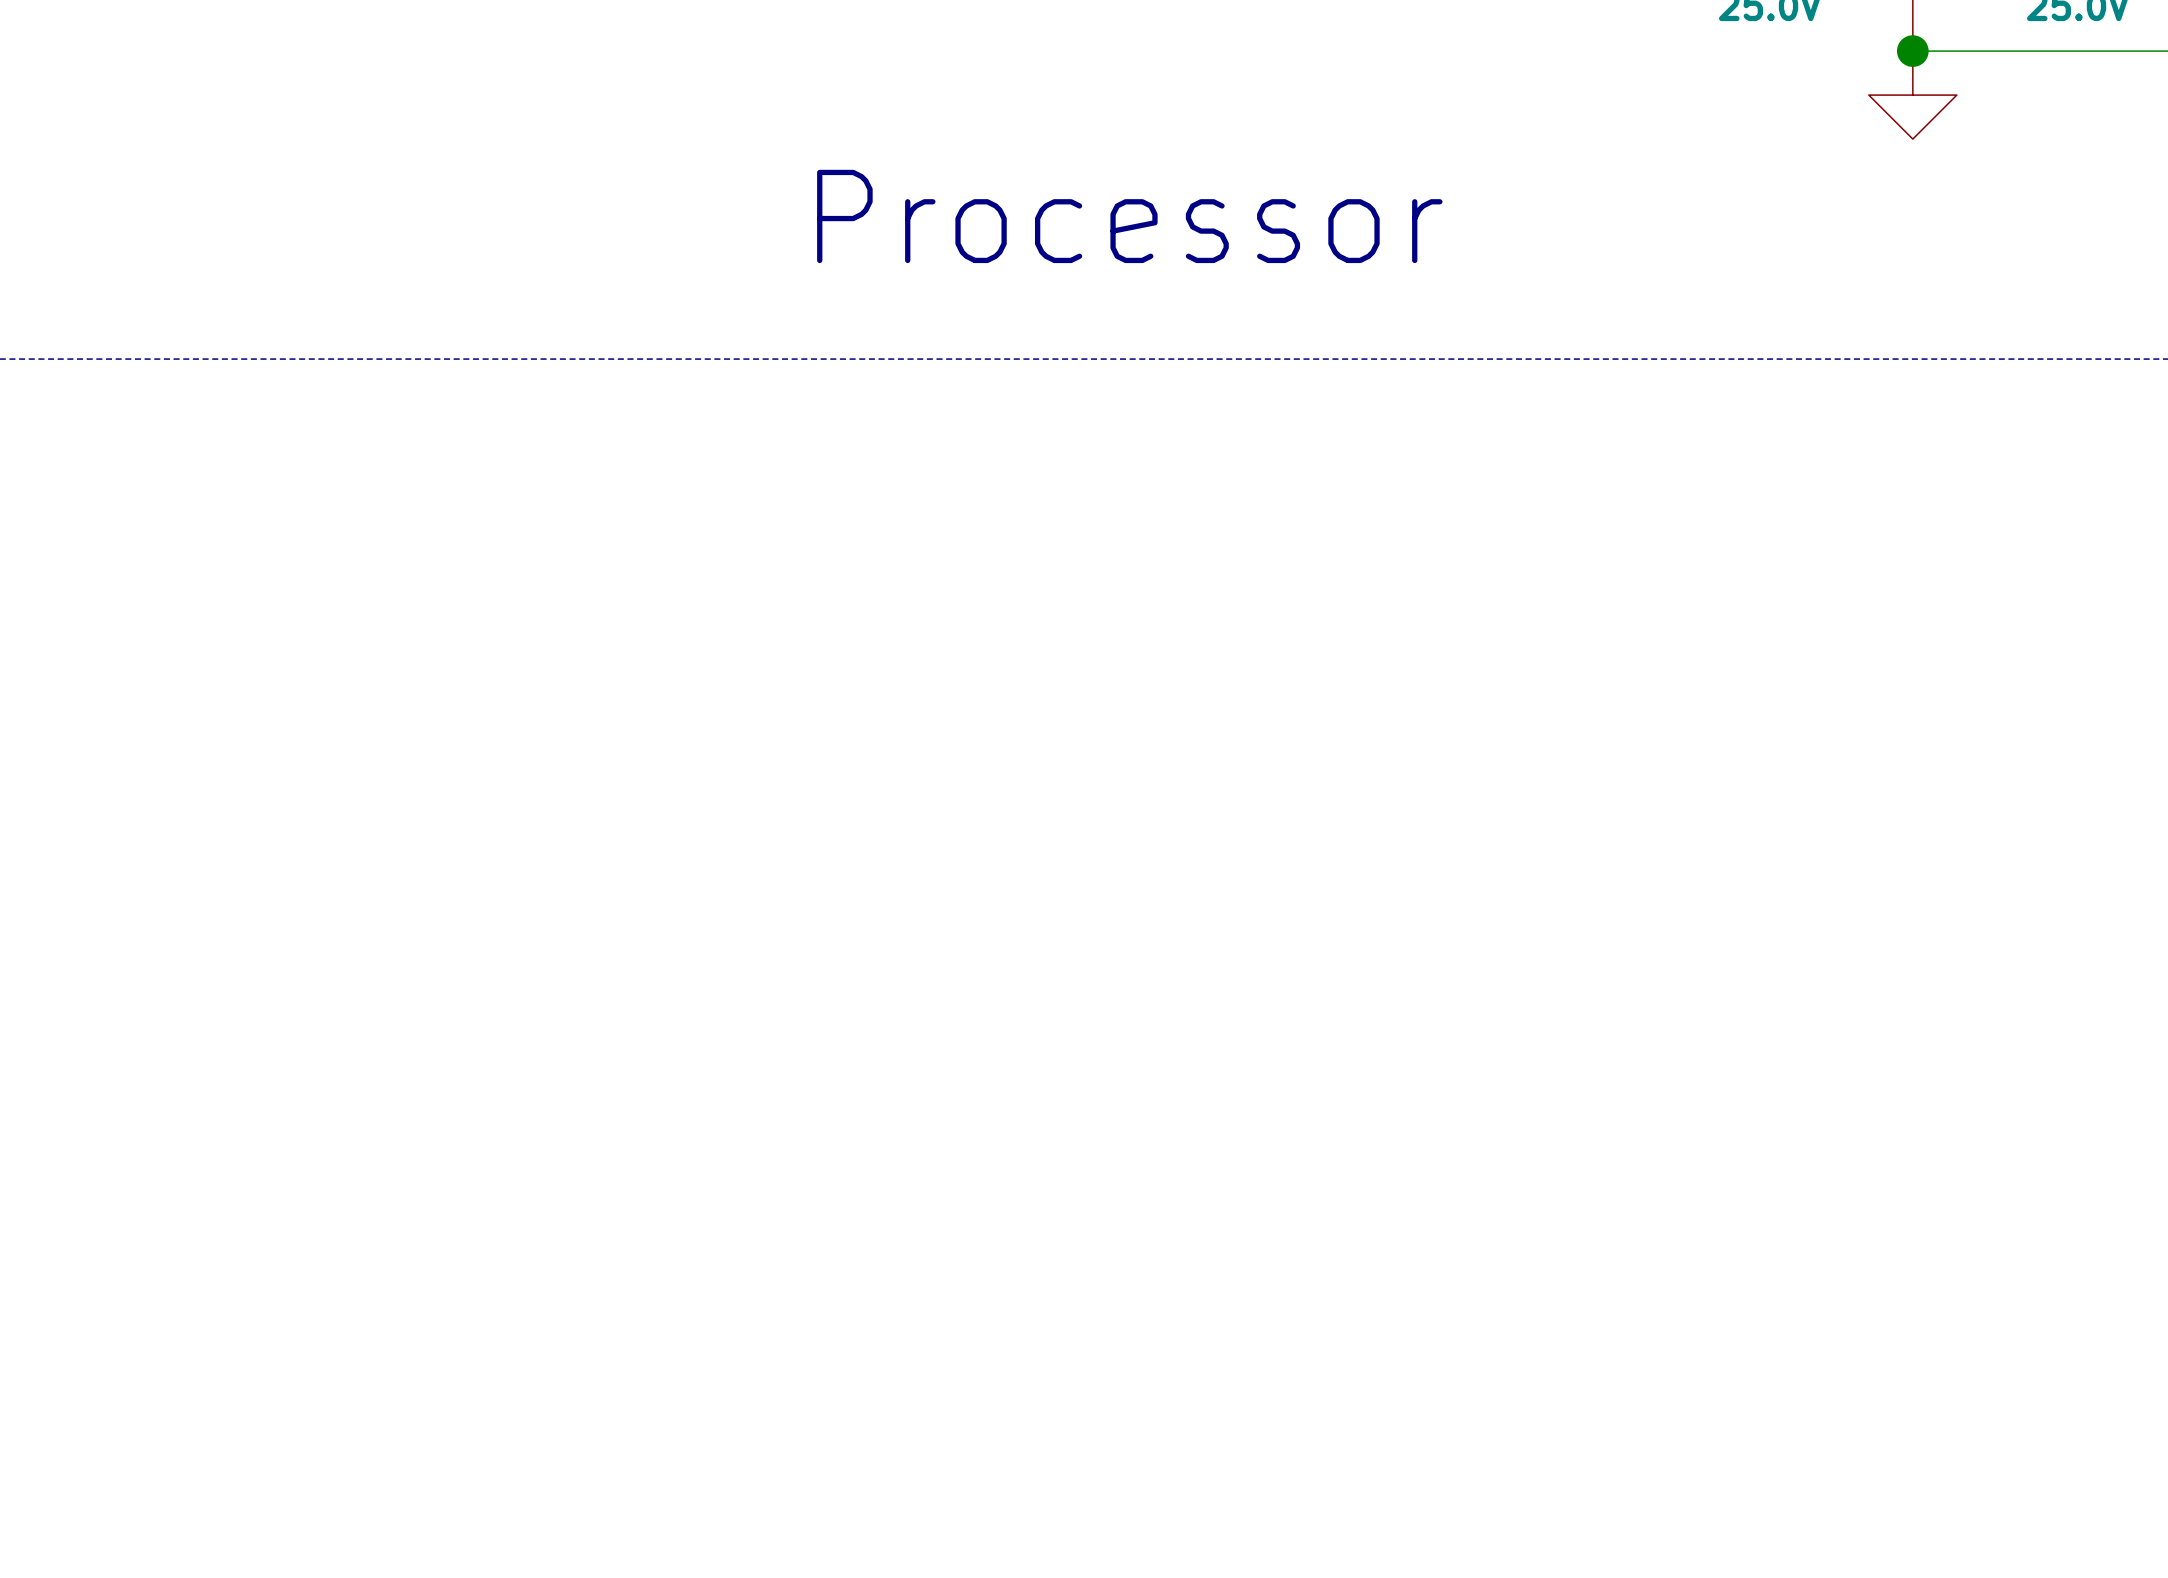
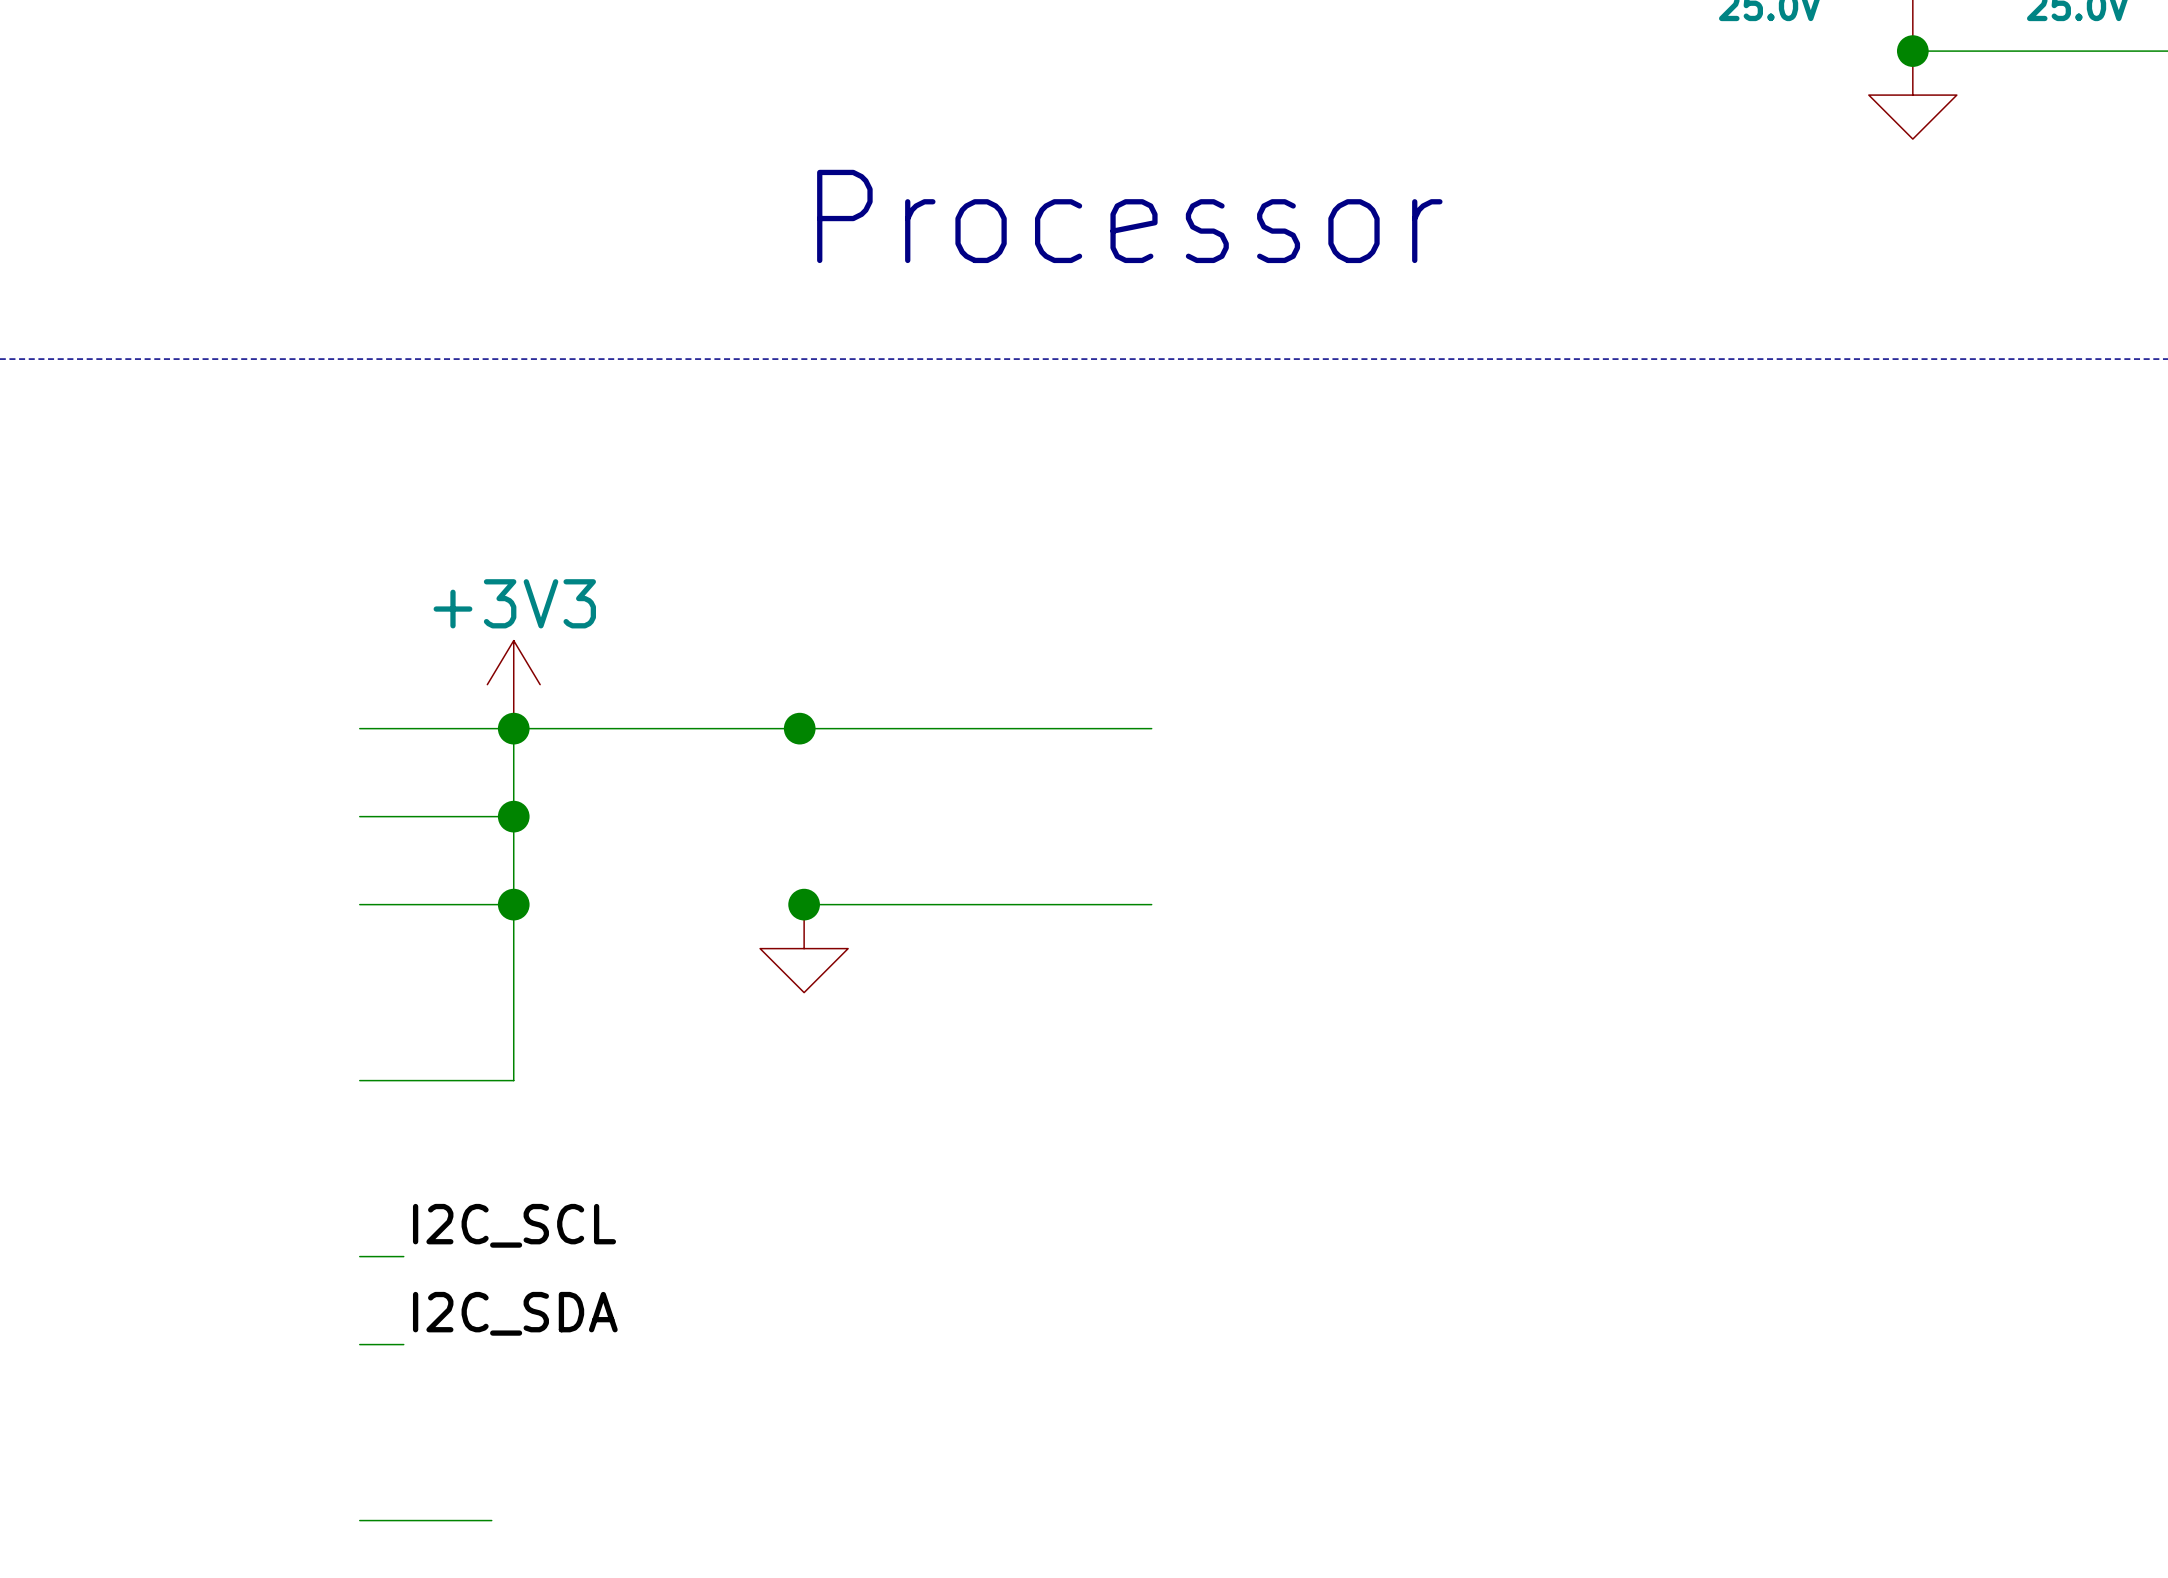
power symbol: none -> +3V3 (513, 684)
wire: none -> (359, 728) (1151, 728)
wire: none -> (513, 728) (513, 1080) (359, 1080)
junction: none -> (513, 728)
junction: none -> (799, 728)
wire: none -> (359, 816) (513, 816)
junction: none -> (513, 816)
wire: none -> (359, 904) (513, 904)
junction: none -> (513, 904)
wire: none -> (799, 904) (1151, 904)
junction: none -> (804, 904)
power symbol: none -> (804, 948)
label: none -> I2C_SCL (514, 1225)
wire: none -> (359, 1256) (403, 1256)
label: none -> I2C_SDA (515, 1313)
wire: none -> (359, 1344) (403, 1344)
wire: none -> (359, 1520) (491, 1520)

